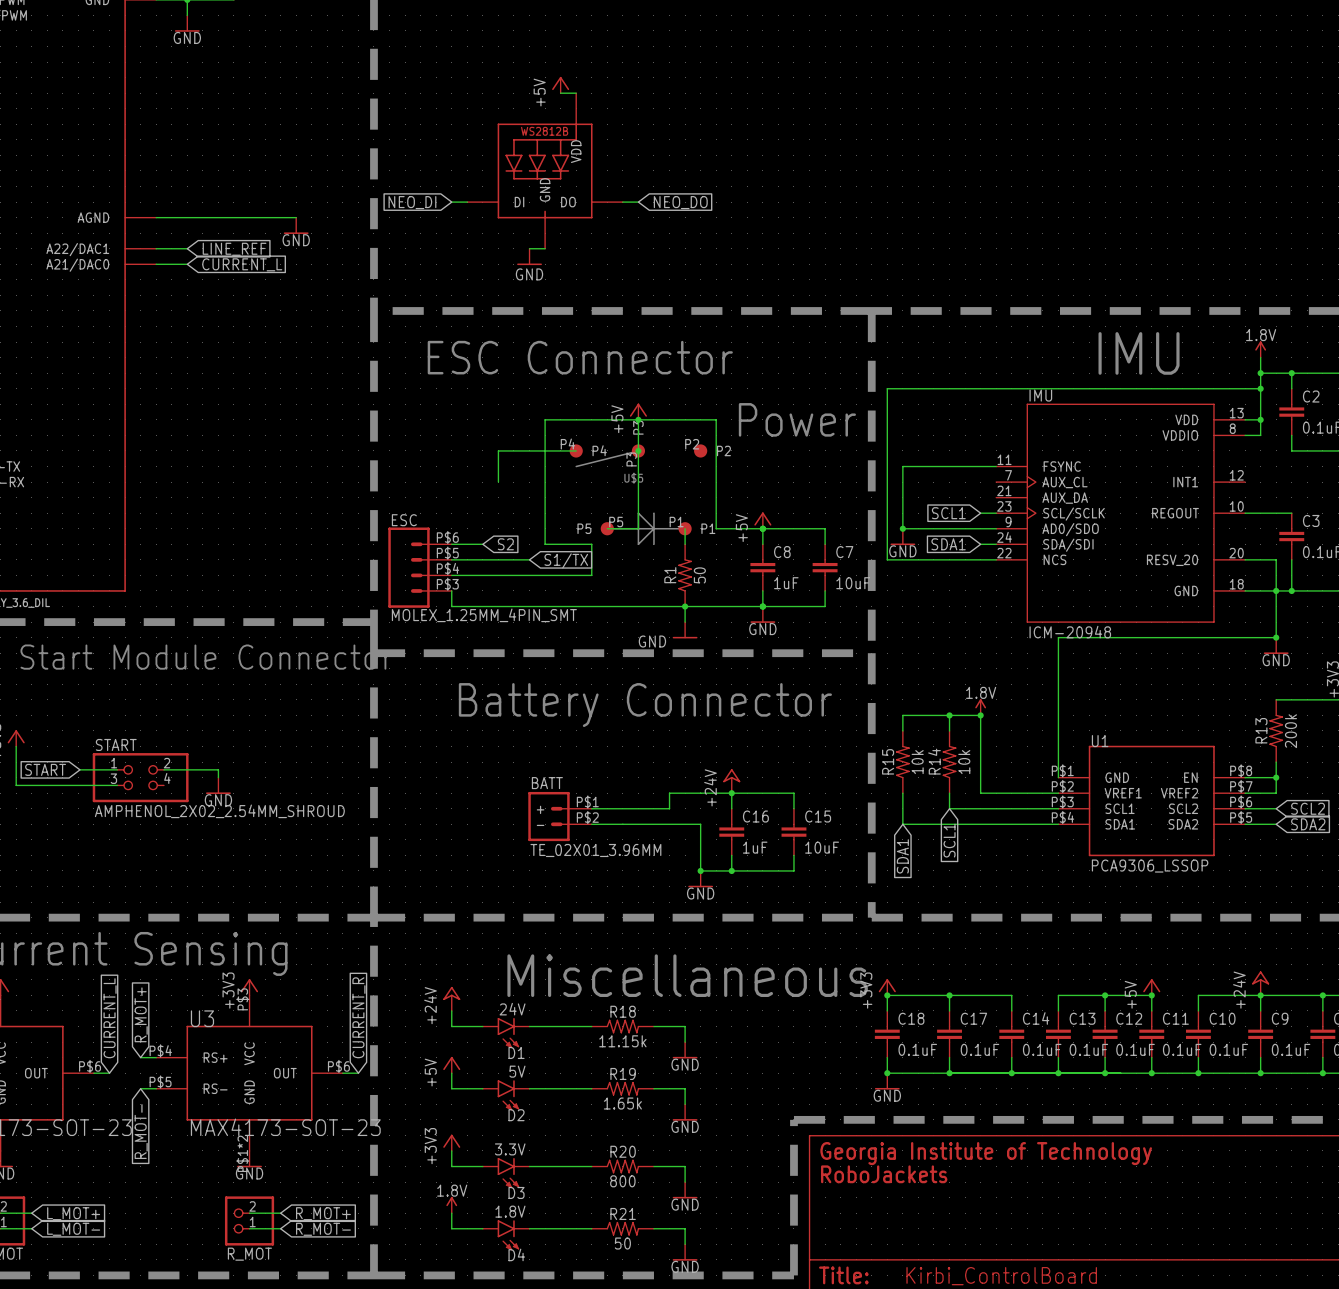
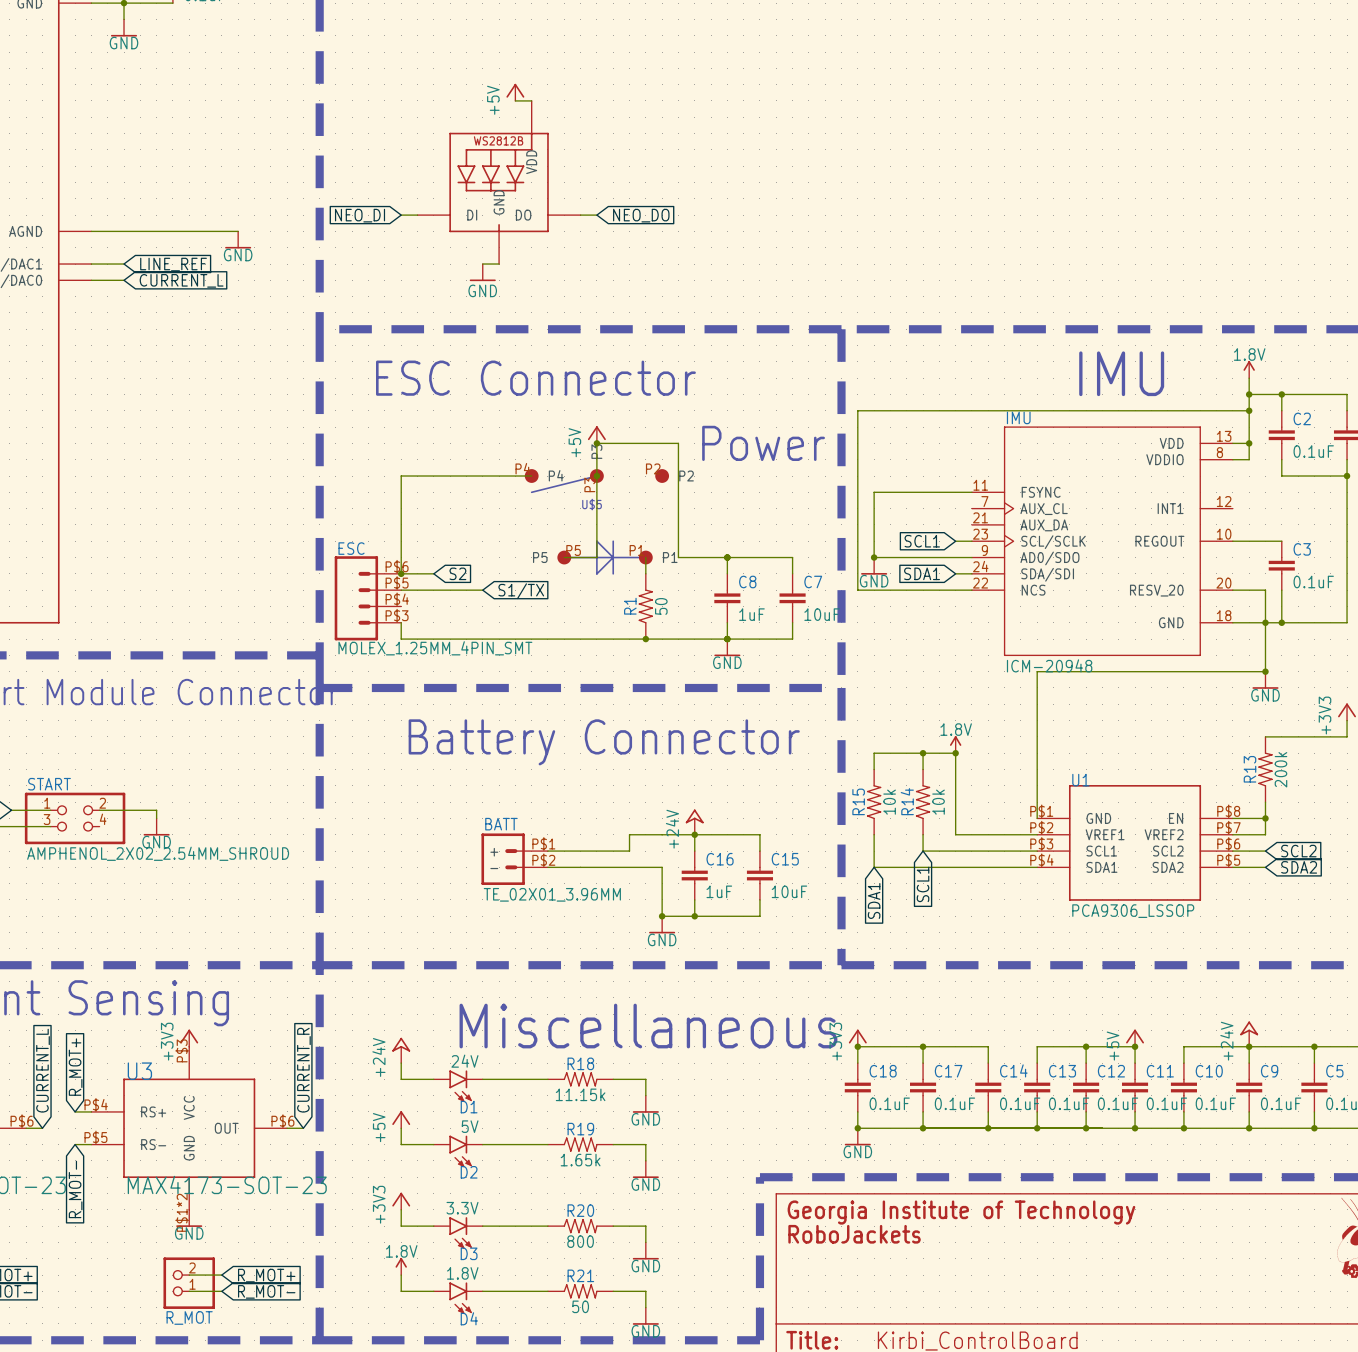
wire: (638, 419) (545, 419) (545, 544) (591, 544) (591, 575) (451, 575) -> none
wire: (498, 450) (498, 482) -> (450, 476) (401, 476) (401, 573)
power symbol: +5V (762, 520) -> none
junction: none -> (401, 573)
wire: (685, 606) (685, 622) -> none
power symbol: GND (685, 630) -> none

